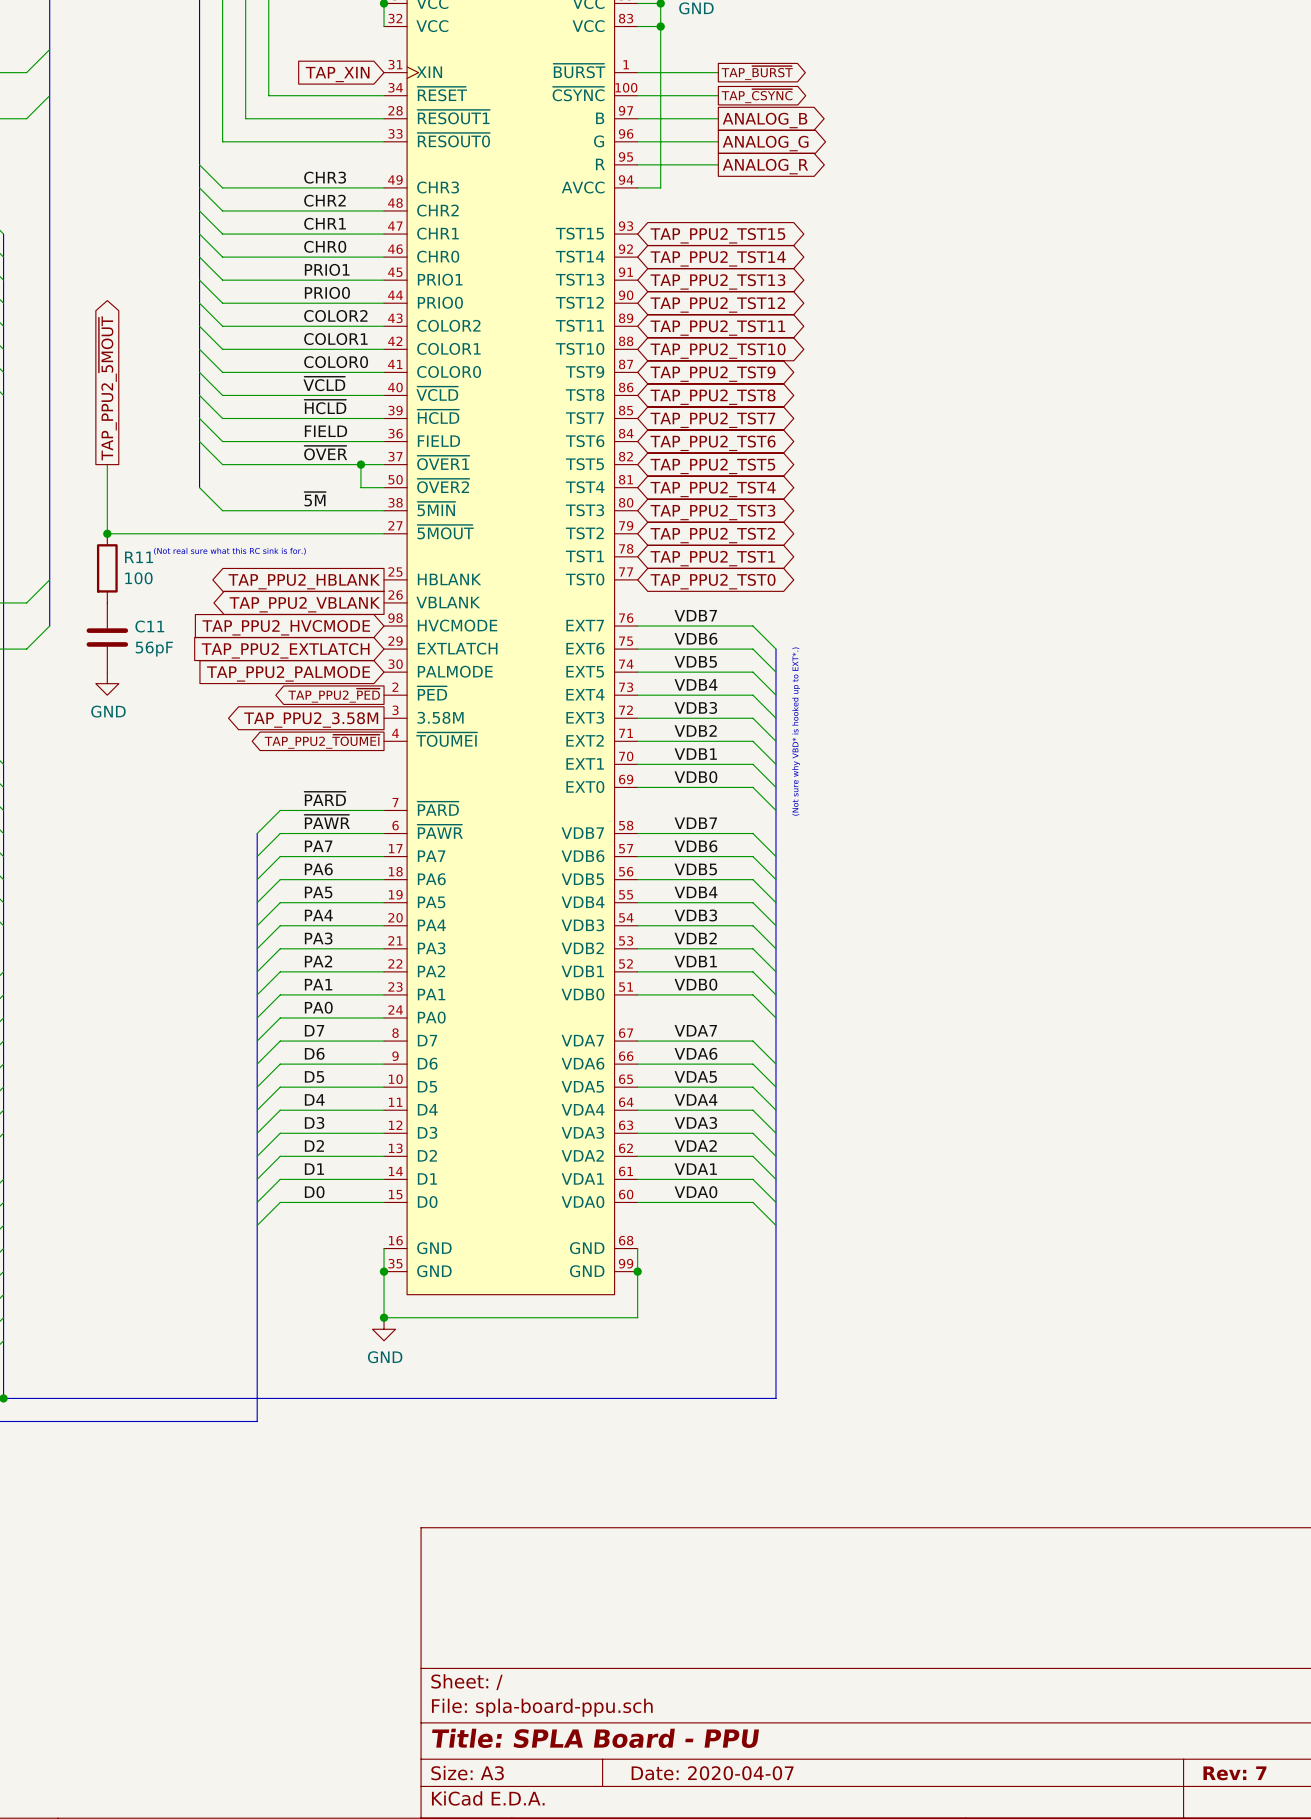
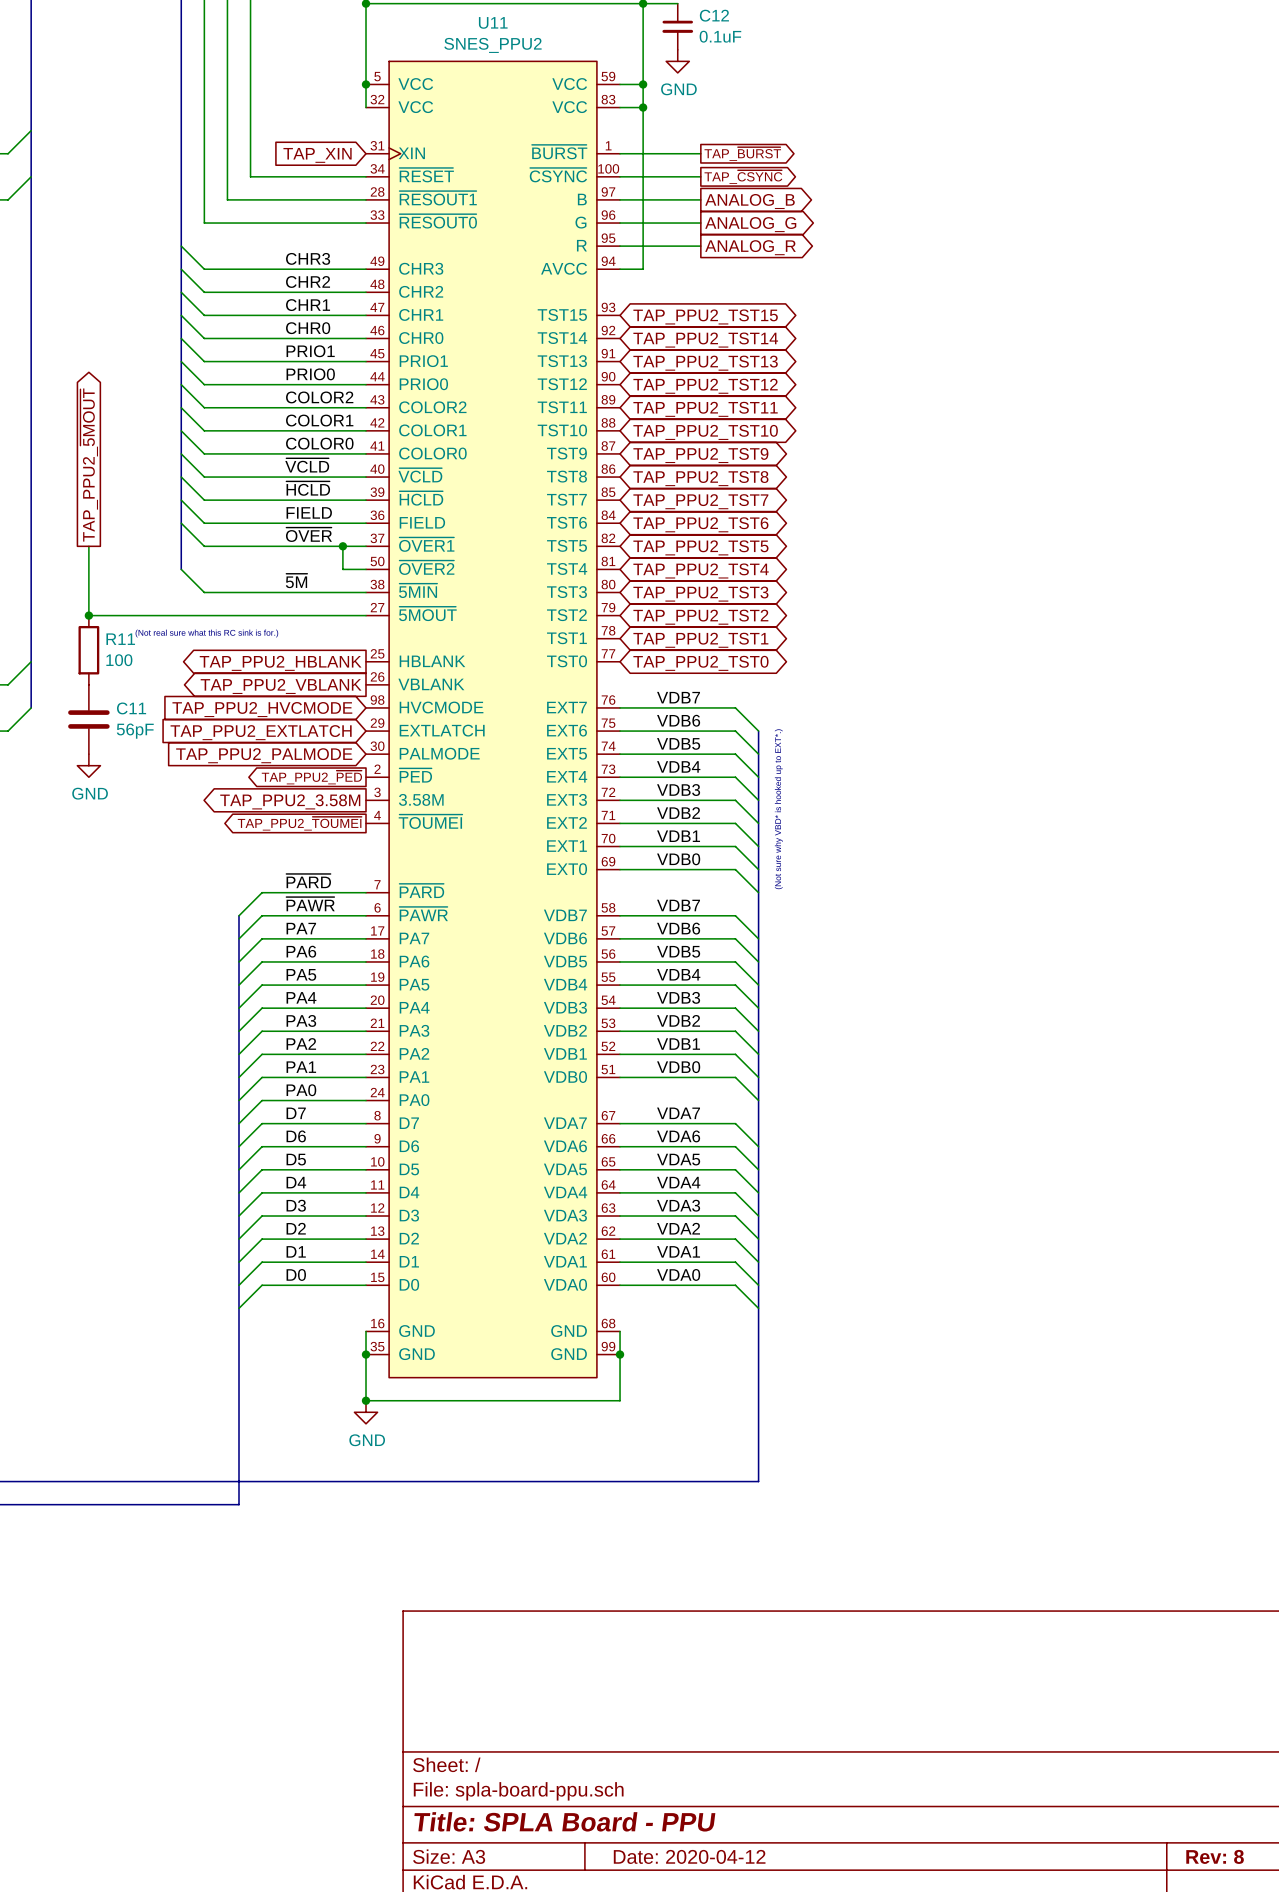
title block: Date: 2020-04-07 (712, 1773) -> Date: 2020-04-12 (689, 1856)
title block: Rev: 7 (1234, 1773) -> Rev: 8 (1215, 1856)

